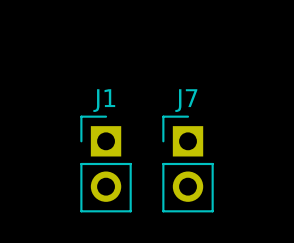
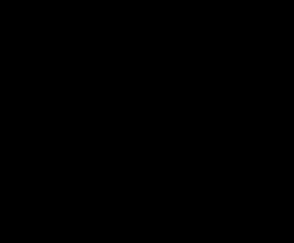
J1: (106, 163) -> none
J7: (188, 163) -> none

